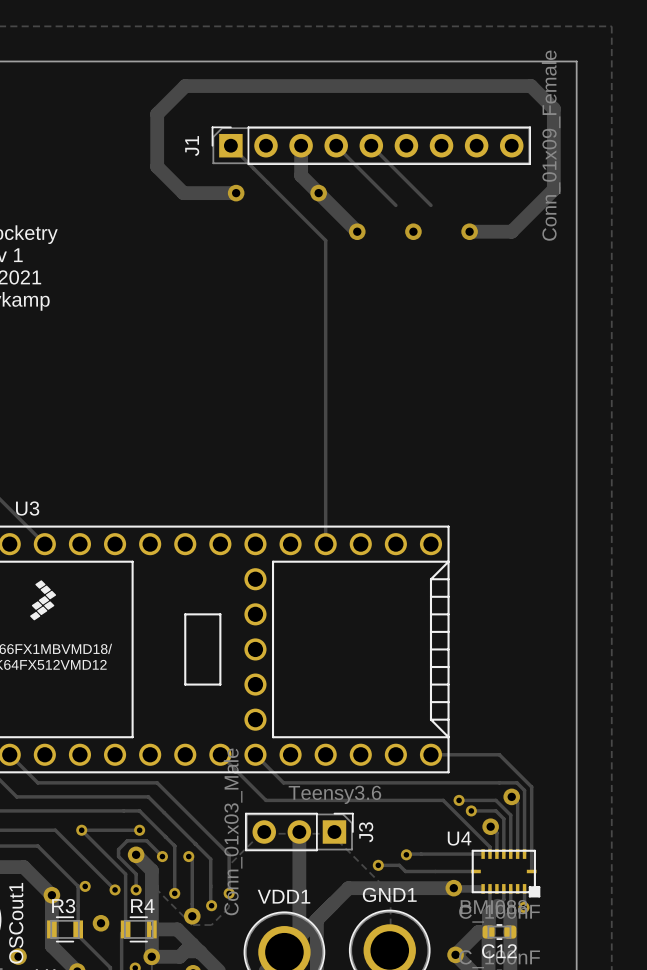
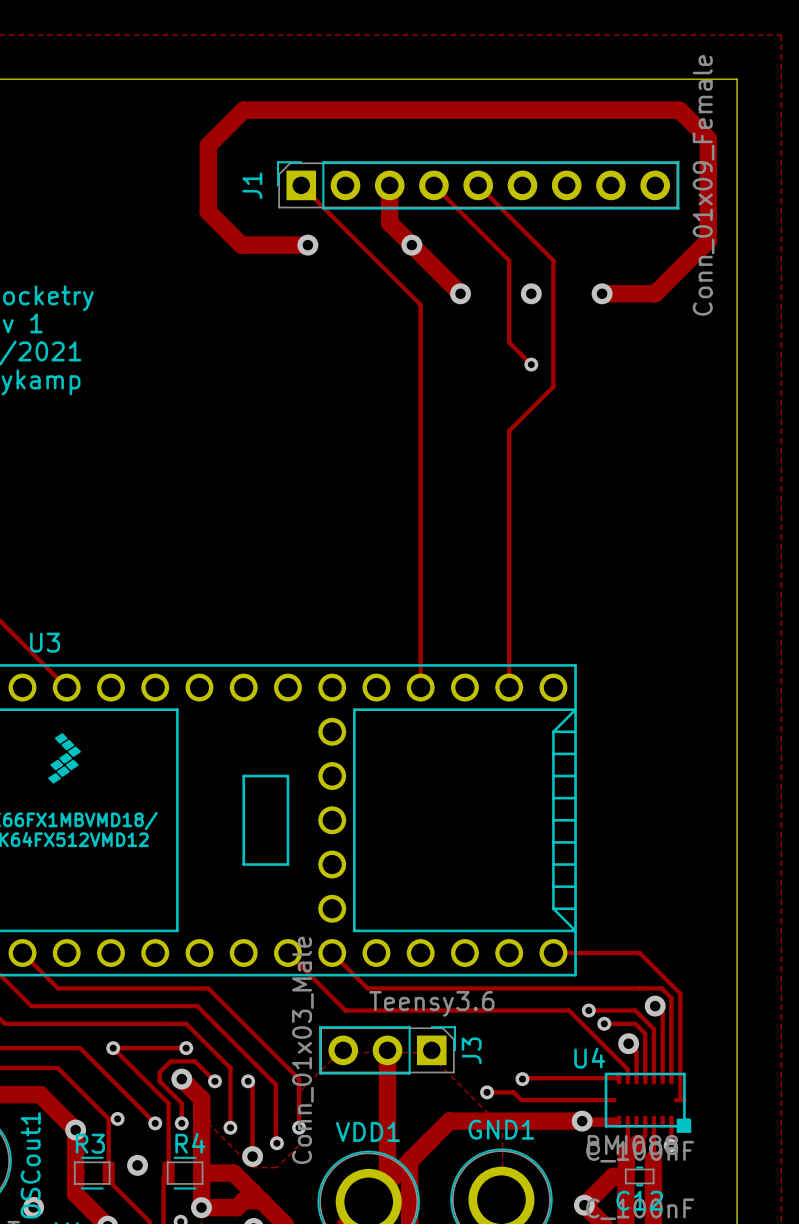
track: none -> (509, 260) (509, 342) (531, 364)
track: none -> (553, 260) (553, 386) (509, 430) (509, 687)
via: none -> (531, 364)

